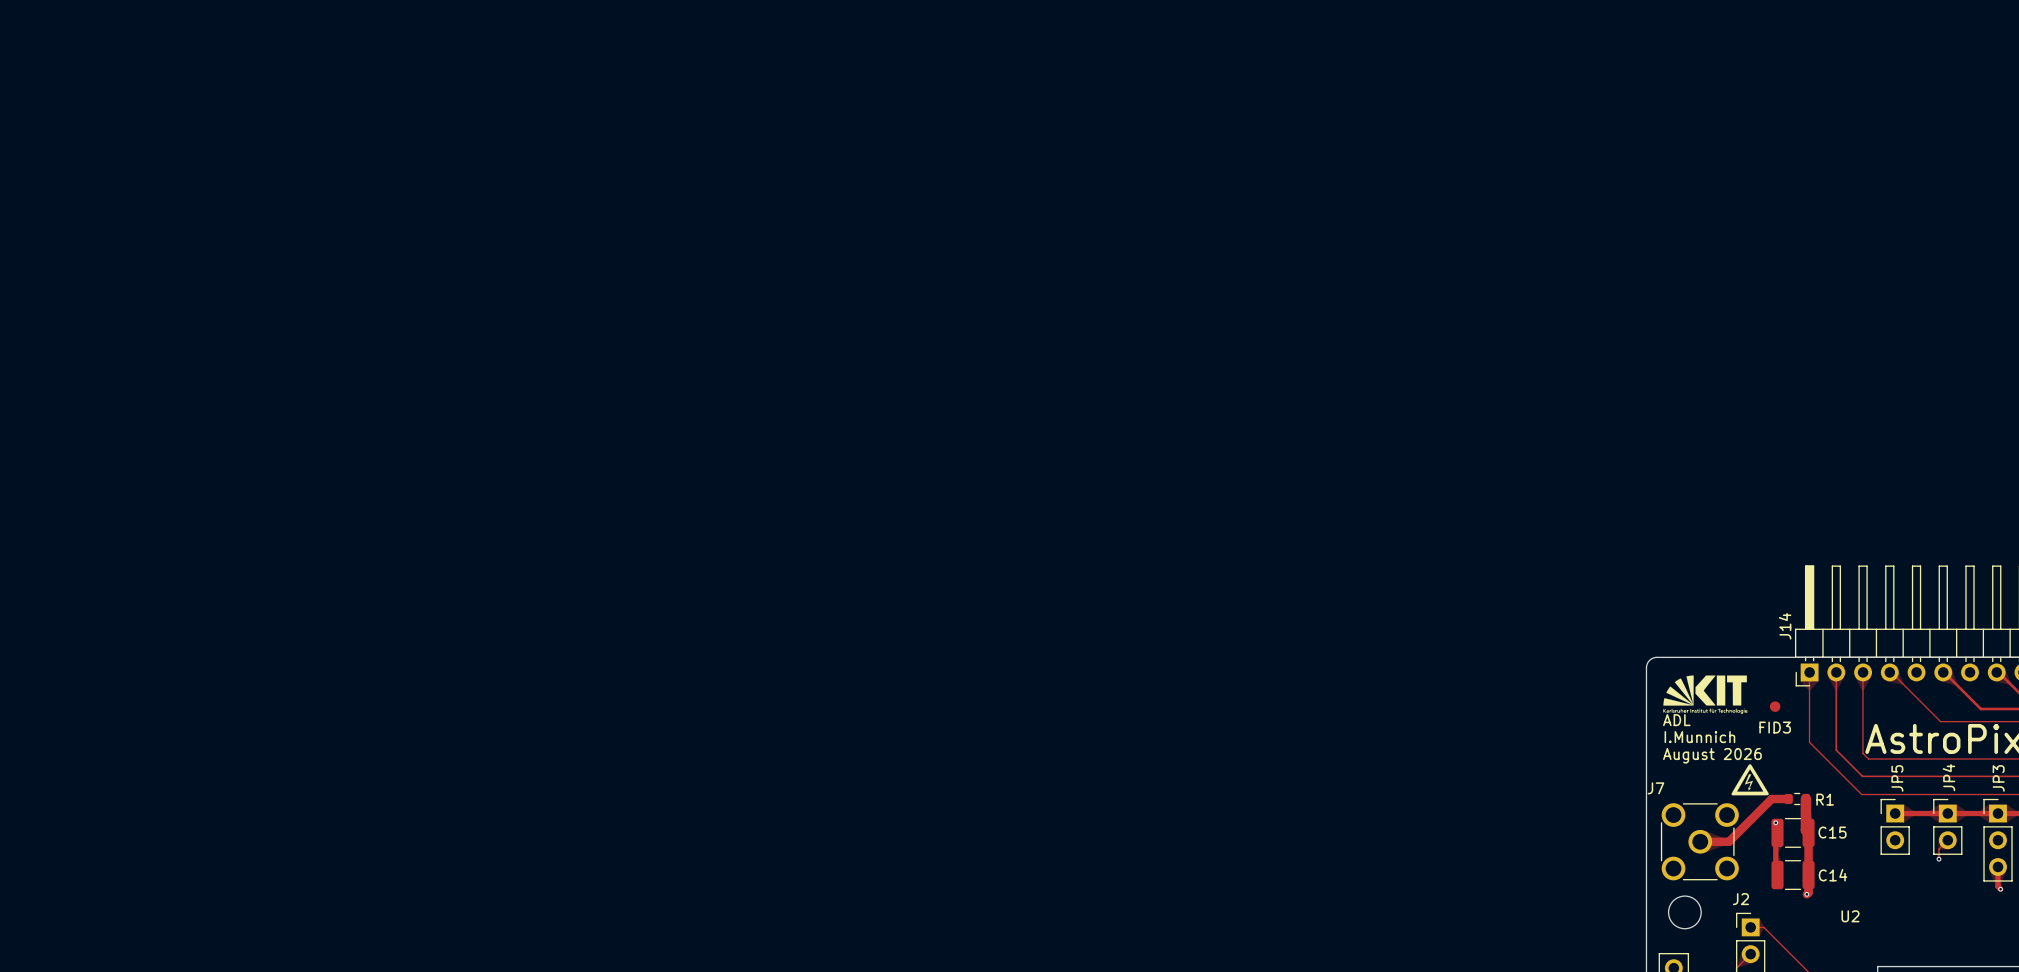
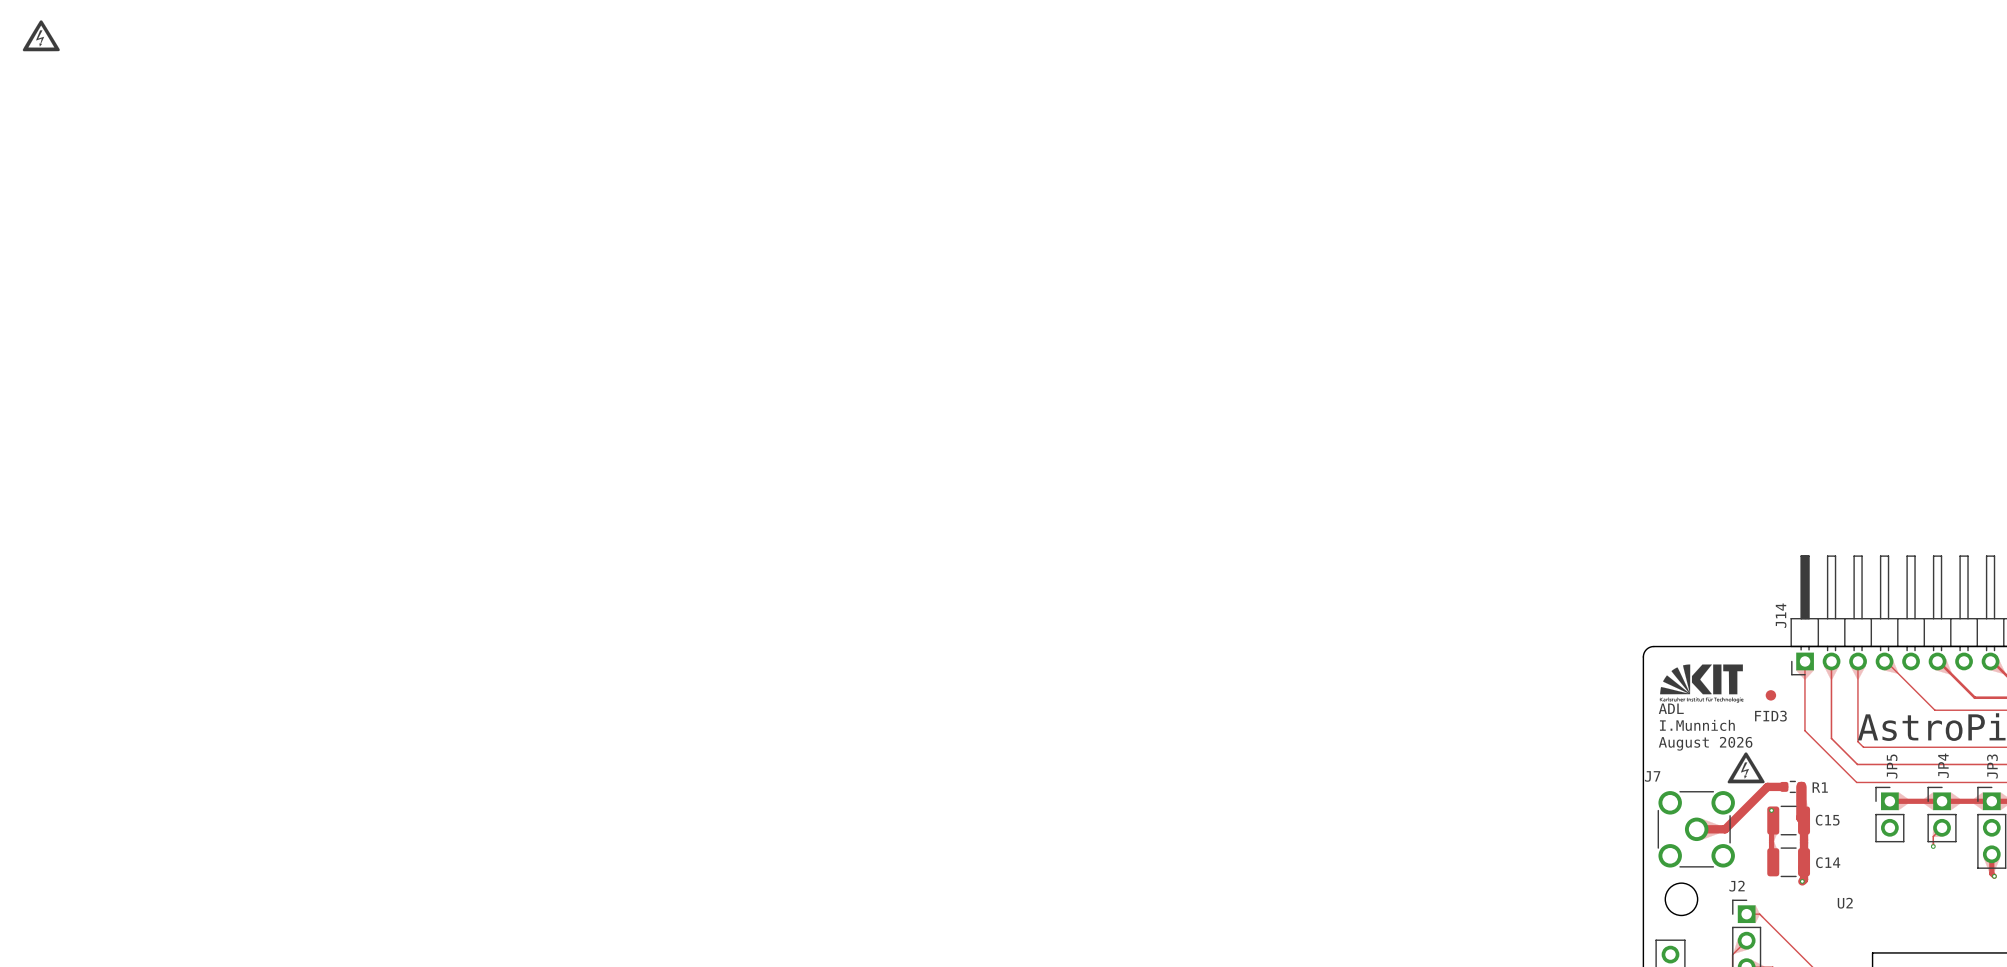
drawing: none -> [22, 20, 60, 52]

